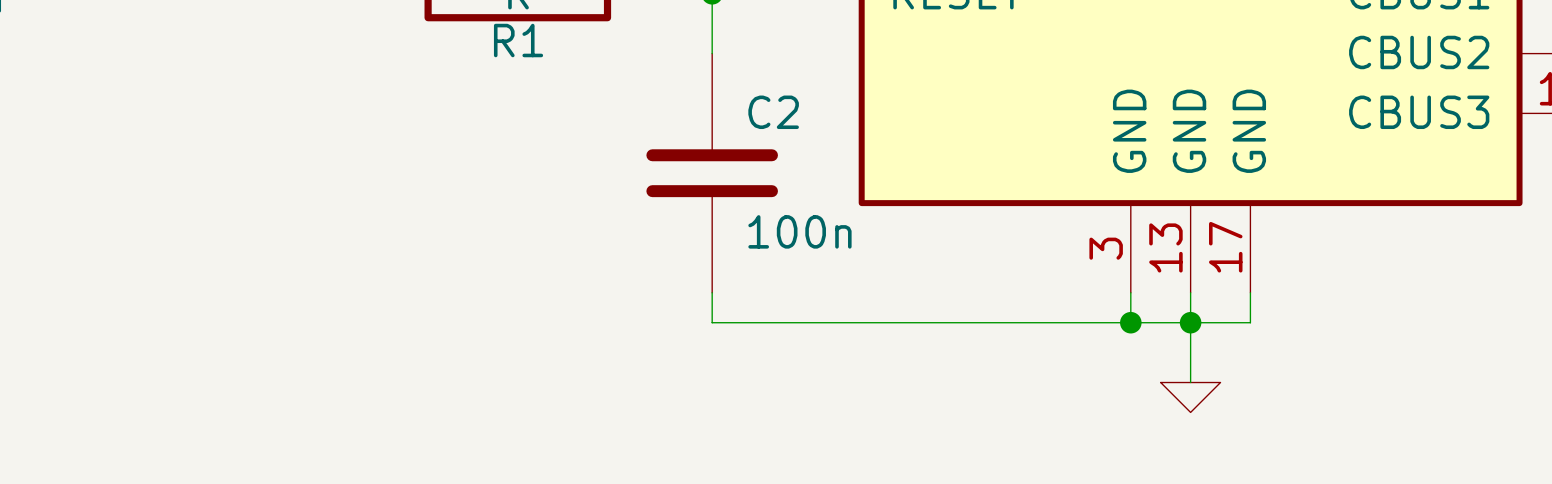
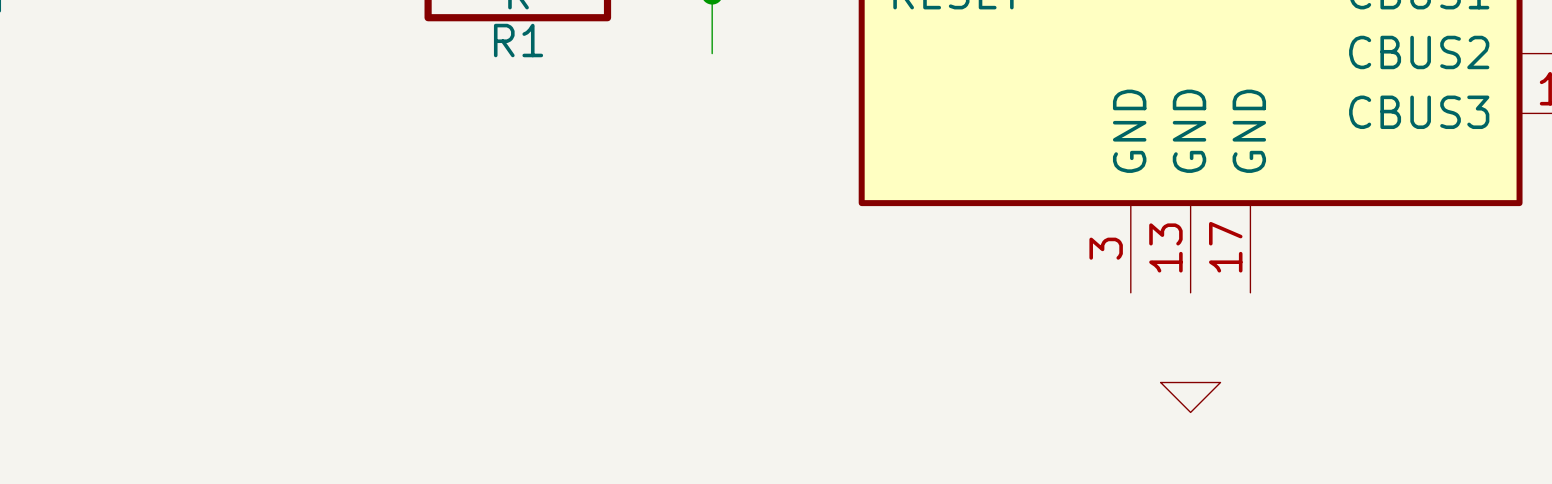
C2: 100n (712, 173) -> none
wire: (712, 292) (712, 322) (1250, 322) (1250, 292) -> none
wire: (1130, 292) (1130, 322) -> none
wire: (1190, 292) (1190, 382) -> none
junction: (1130, 322) -> none
junction: (1190, 322) -> none

